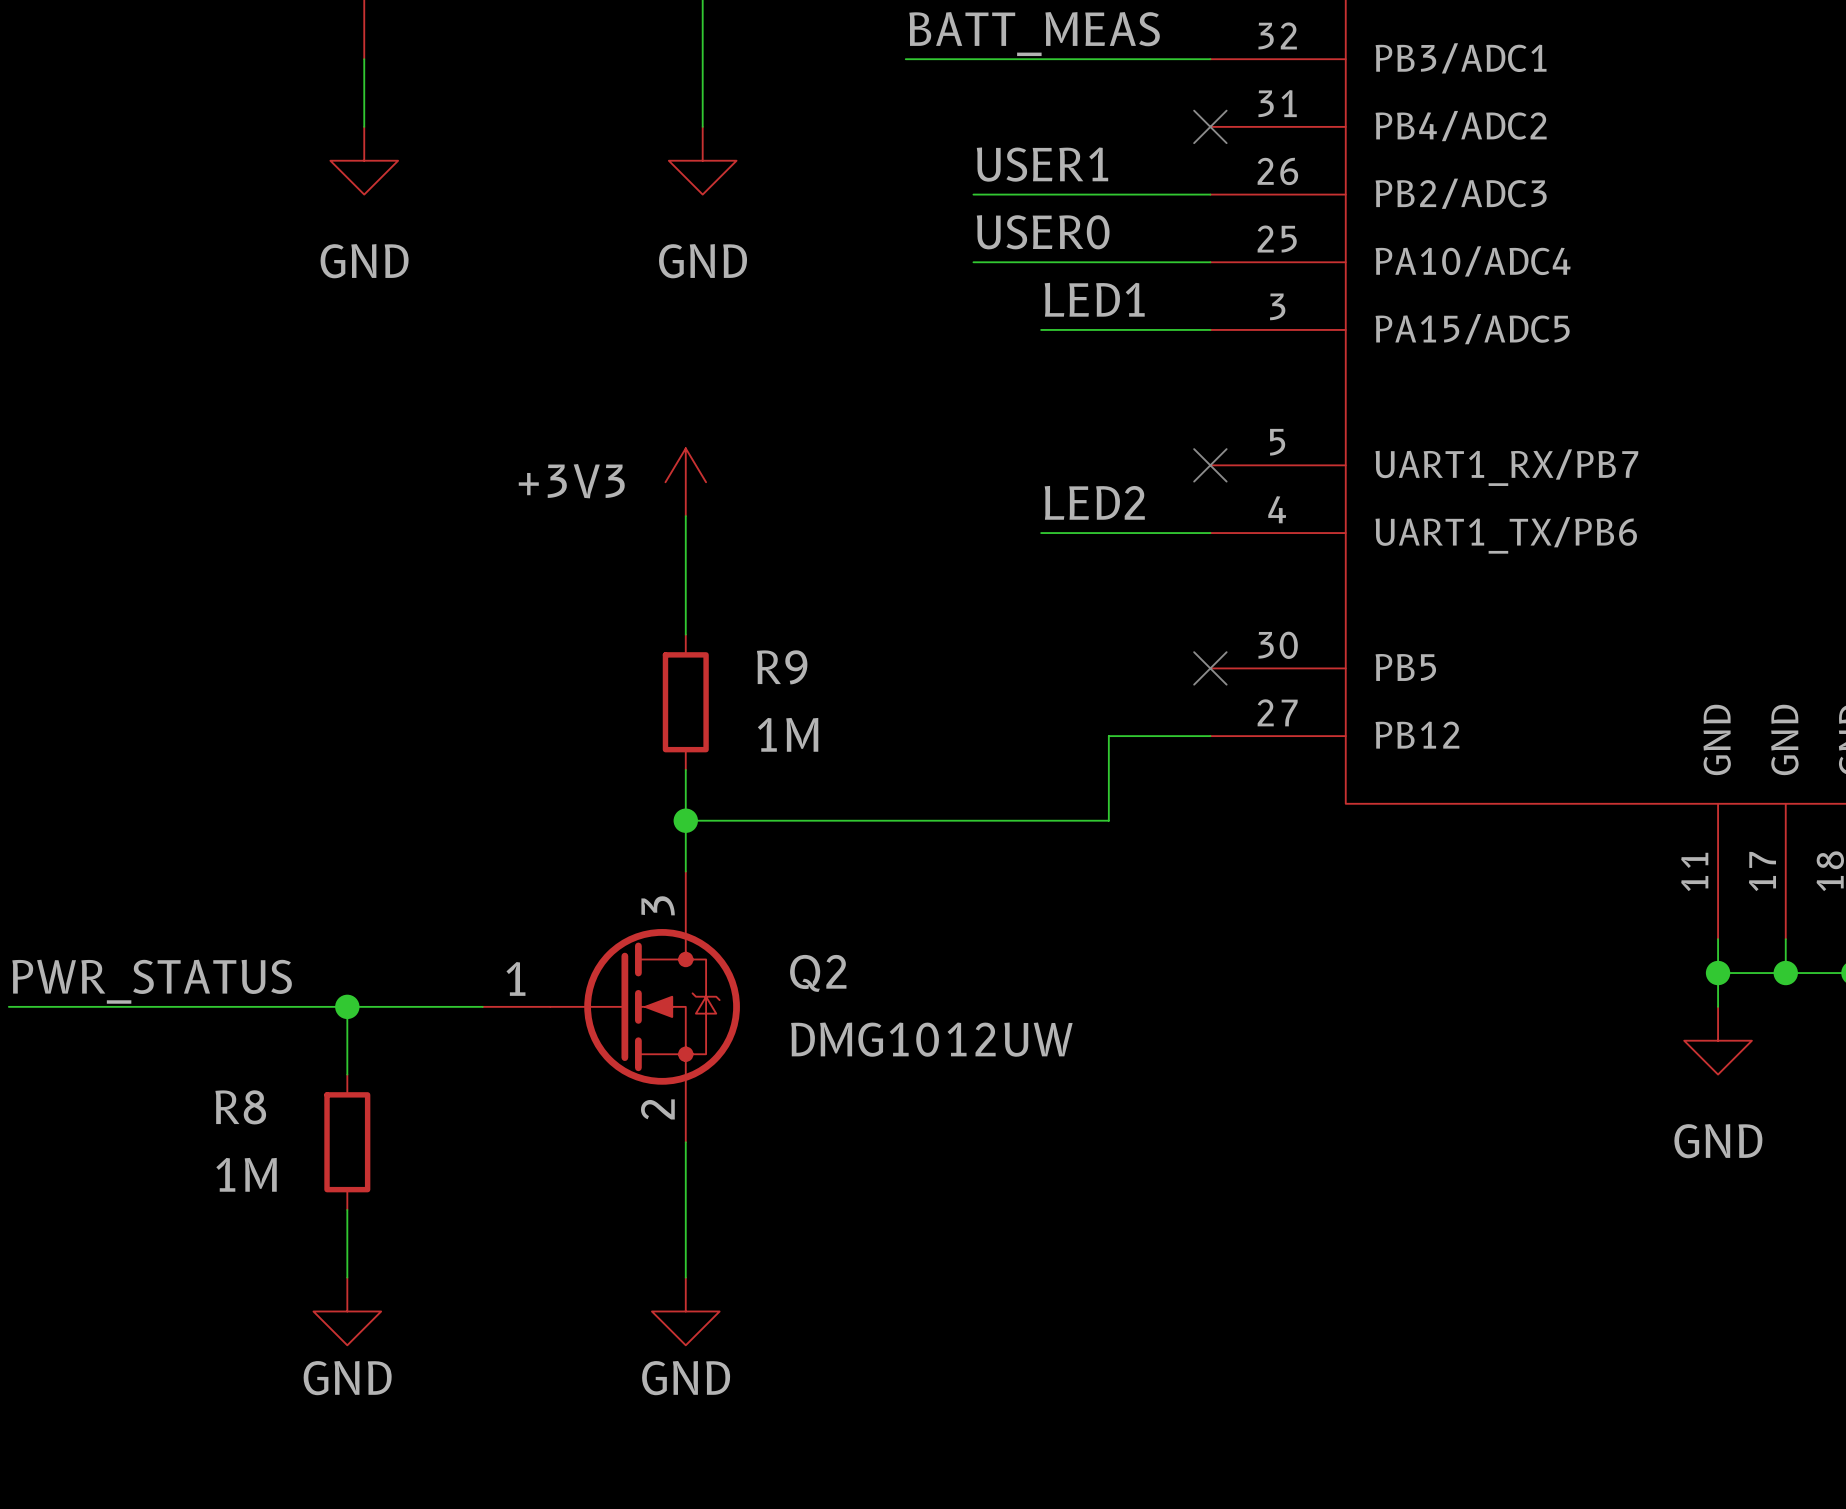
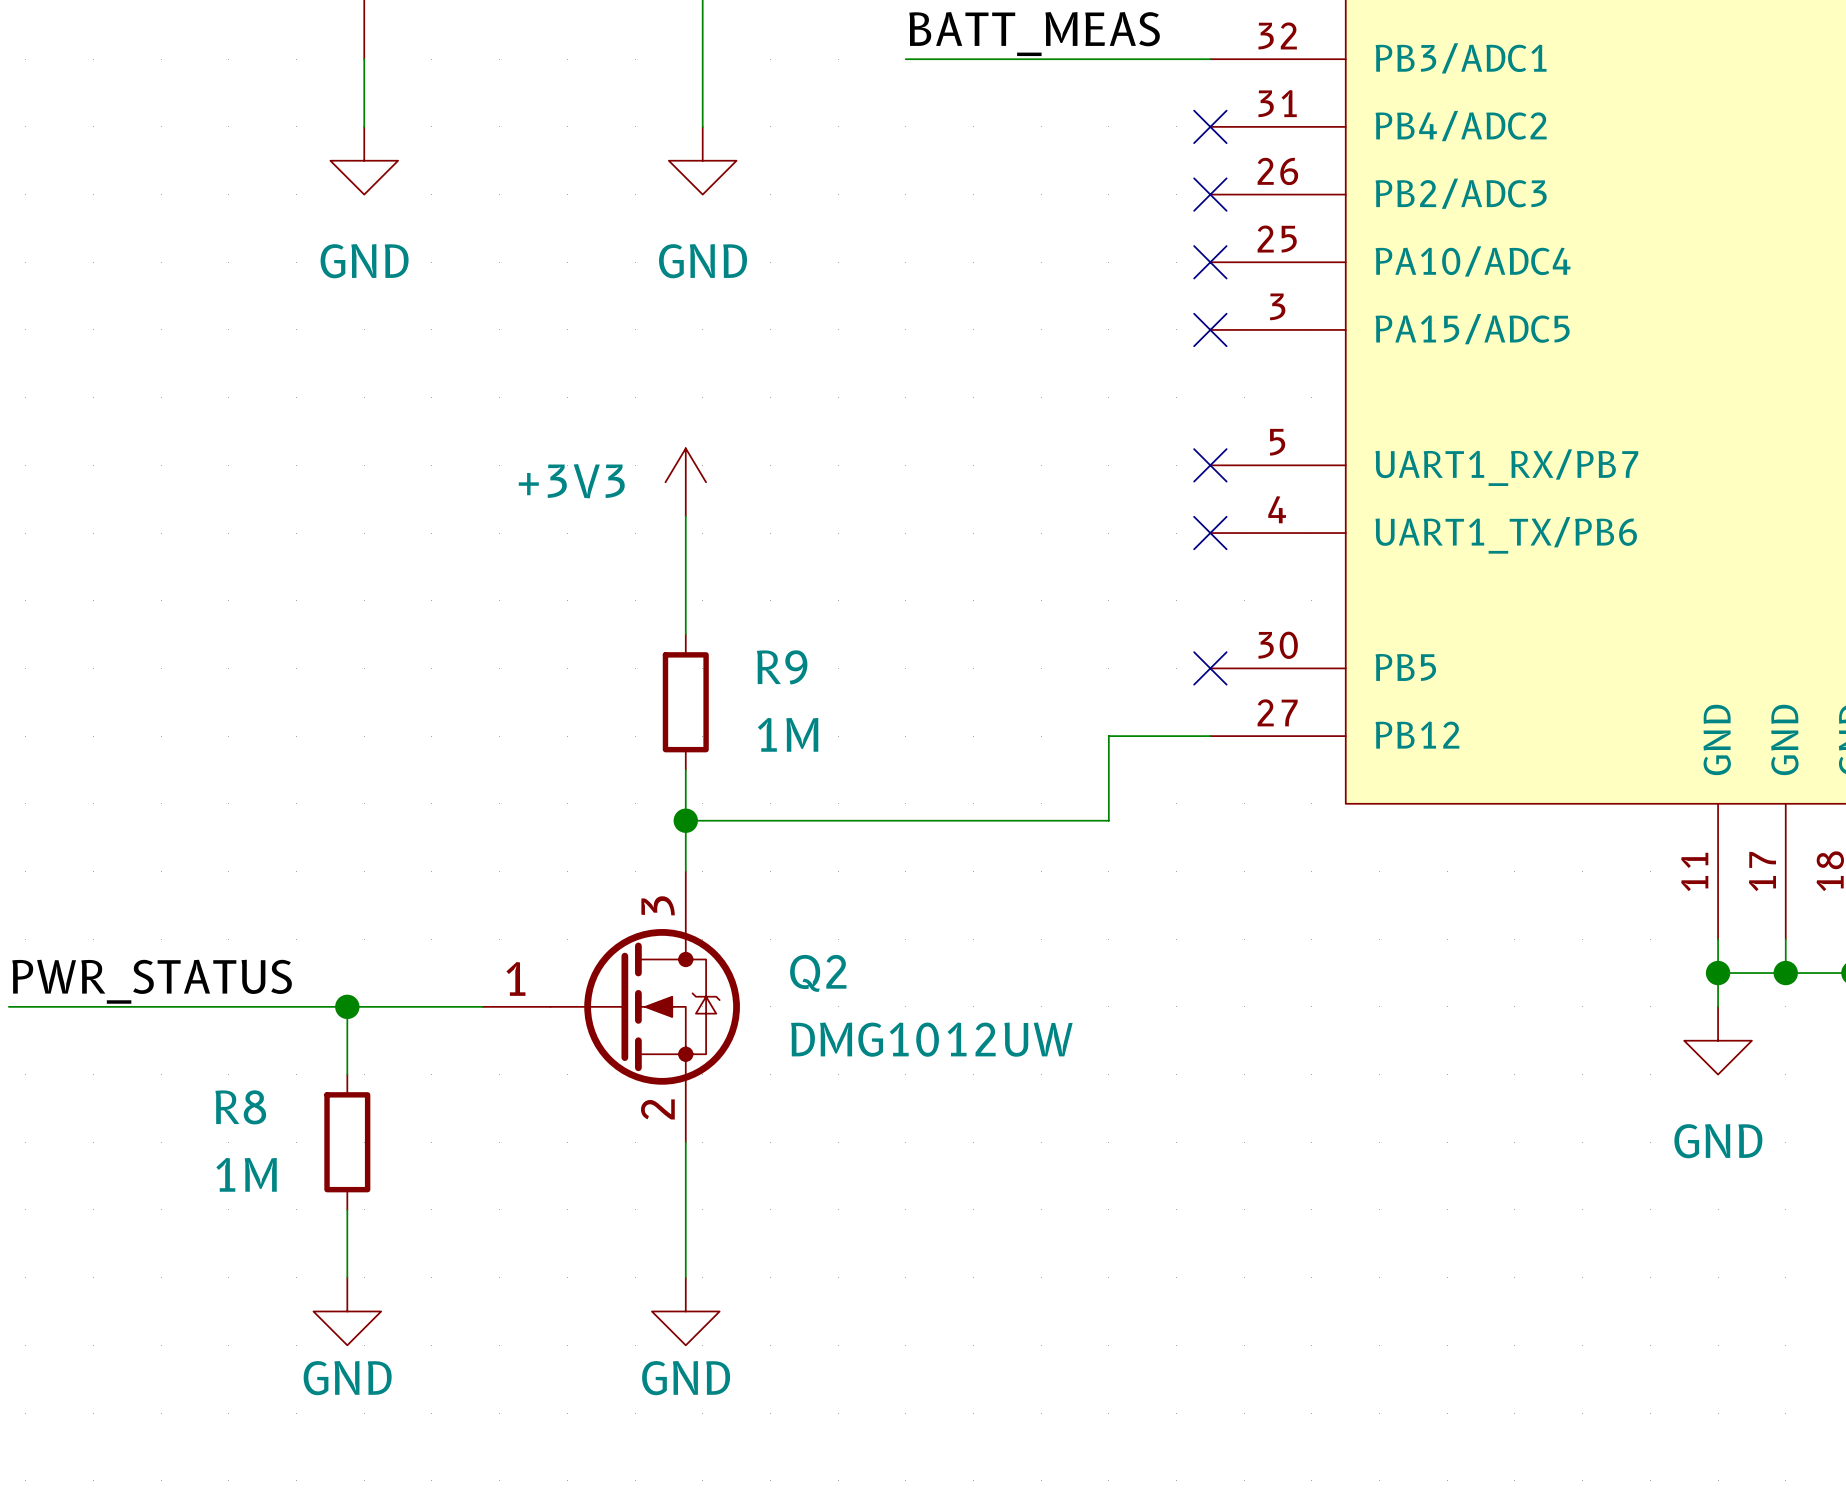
label: USER1 (1042, 164) -> none
wire: (973, 194) (1210, 194) -> none
no-connect mark: none -> (1210, 194)
label: USER0 (1043, 232) -> none
wire: (973, 262) (1210, 262) -> none
no-connect mark: none -> (1210, 262)
label: LED1 (1094, 299) -> none
wire: (1041, 329) (1210, 329) -> none
no-connect mark: none -> (1210, 329)
label: LED2 (1094, 502) -> none
wire: (1041, 533) (1210, 533) -> none
no-connect mark: none -> (1210, 533)

